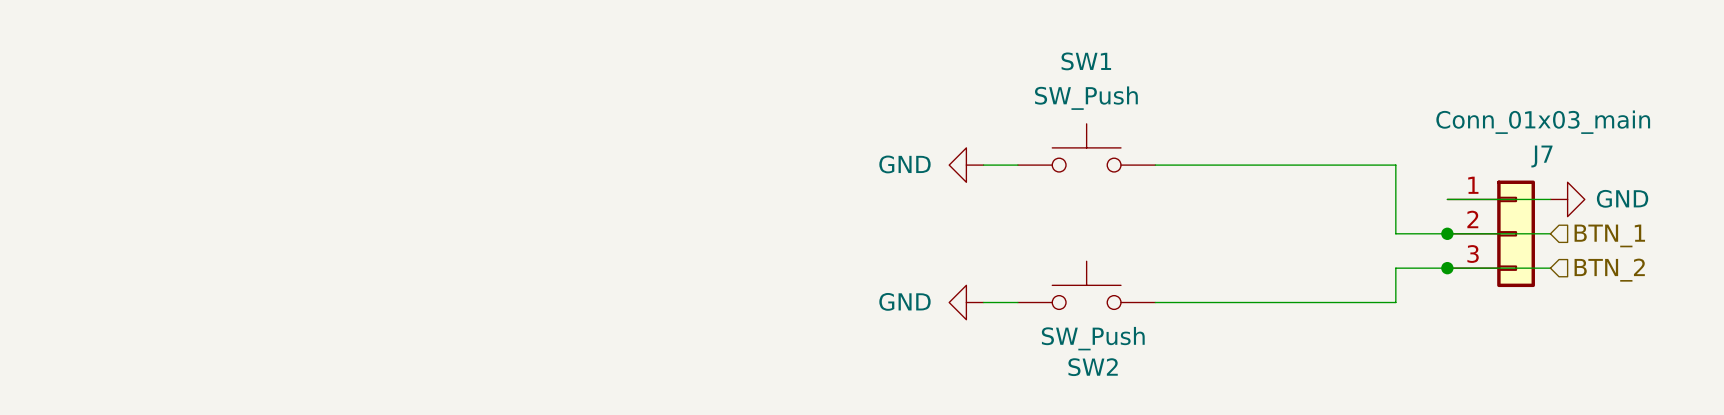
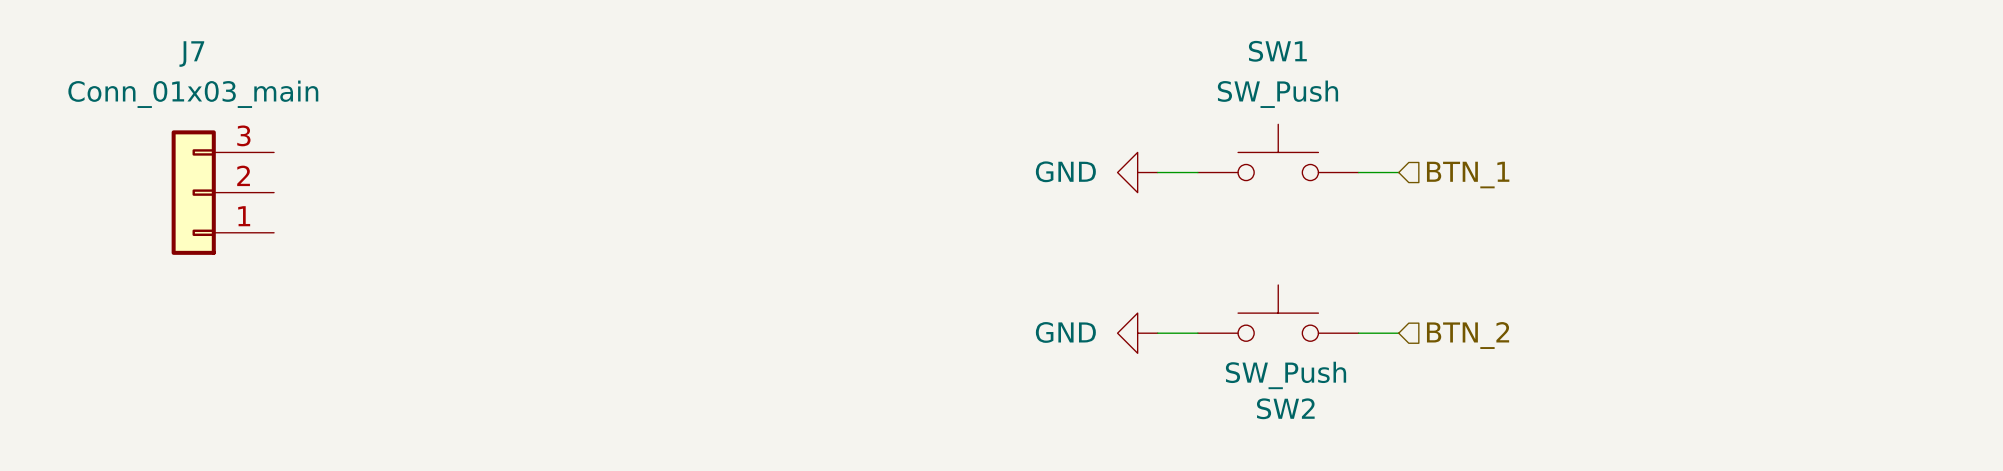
J7 value position: Conn_01x03_main (1543, 122) -> Conn_01x03_main (193, 94)
J7 name position: J7 (1541, 156) -> J7 (191, 54)
wire: (1189, 165) (1395, 165) (1395, 233) (1550, 233) -> none
hierarchical label: none -> BTN_1 (1468, 175)
wire: (1447, 199) (1550, 199) -> none
power symbol: GND (1567, 199) -> none
junction: (1447, 233) -> none
J7 position: (1491, 233) -> (222, 192)
J7 rotation: 0° (1516, 233) -> 180° (193, 192)
hierarchical label: BTN_1 (1609, 235) -> none
junction: (1447, 268) -> none
wire: (1550, 268) (1395, 268) (1395, 302) (1189, 302) -> none
hierarchical label: BTN_2 (1609, 270) -> none
hierarchical label: none -> BTN_2 (1468, 335)

